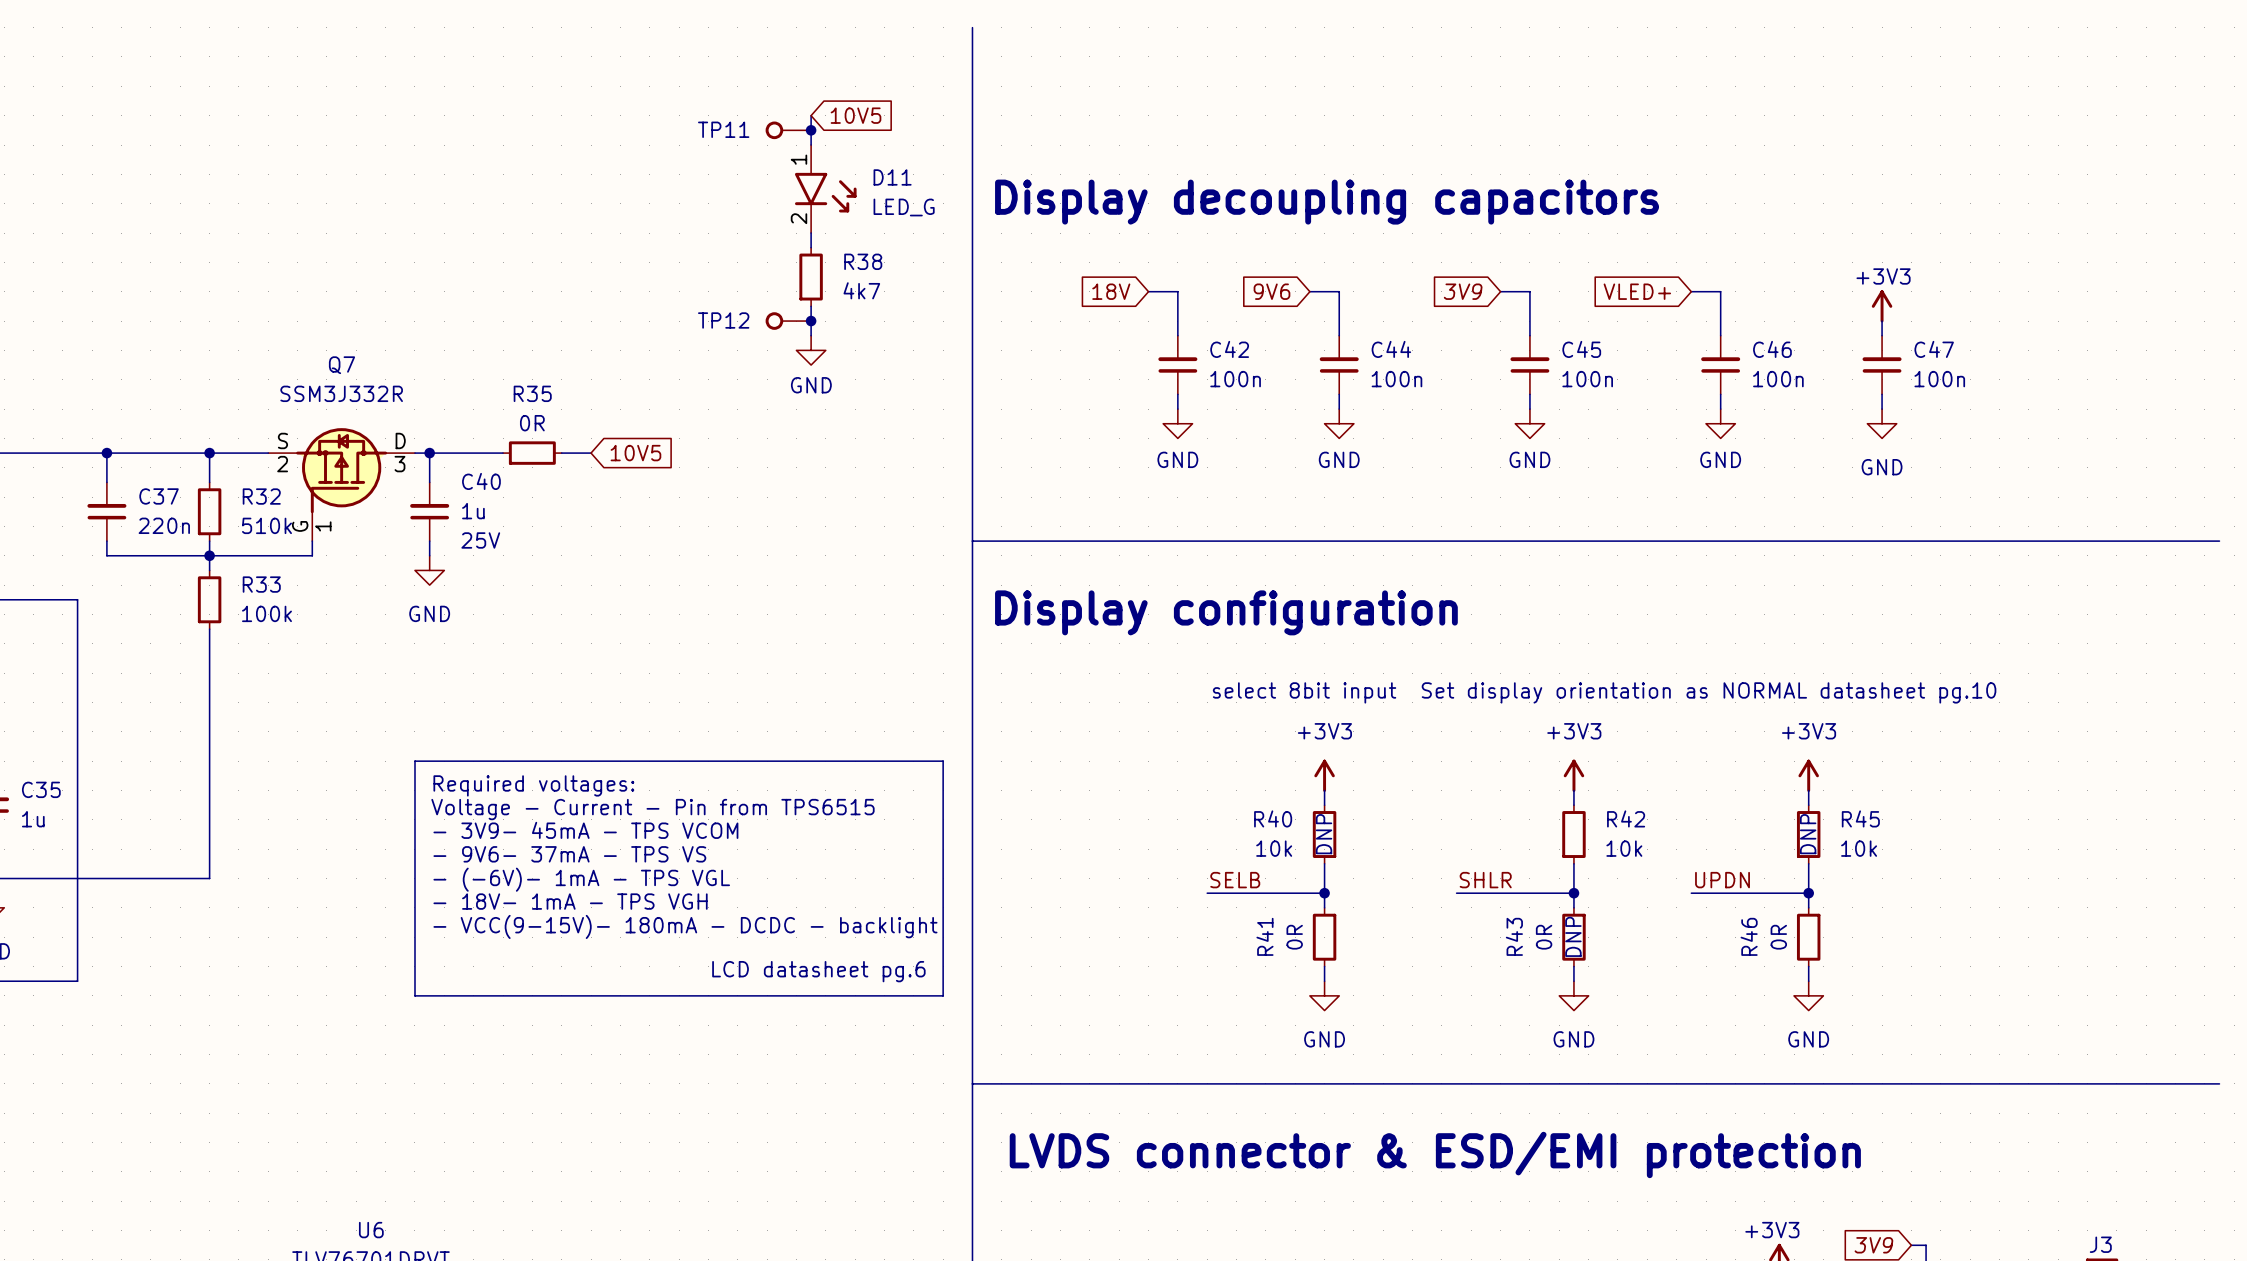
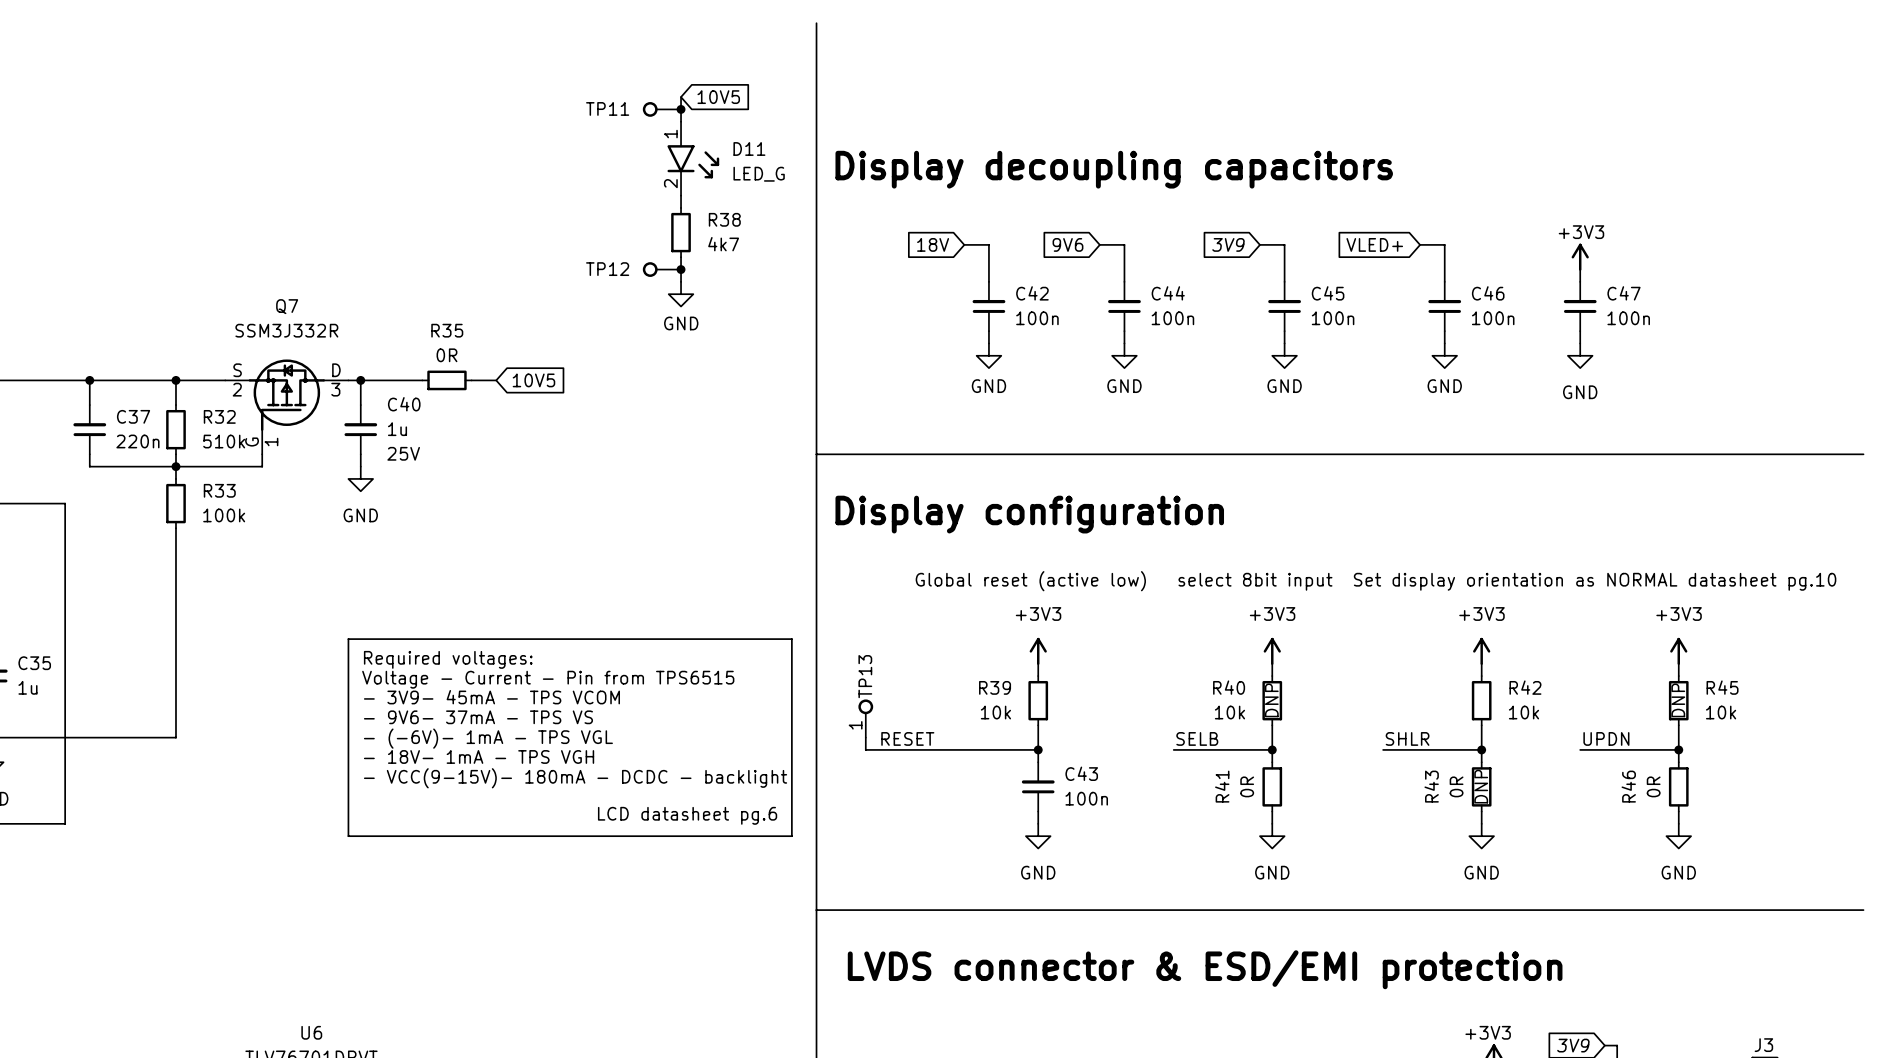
text: none -> Global reset (active low) (1030, 581)
text position: select 8bit input (1304, 692) -> select 8bit input (1255, 581)
text position: Set display orientation as NORMAL datasheet pg.10 (1709, 692) -> Set display orientation as NORMAL datasheet pg.10 (1595, 581)
power symbol position: +3V3 (1324, 775) -> +3V3 (1038, 651)
power symbol position: +3V3 (1573, 775) -> +3V3 (1272, 651)
power symbol position: +3V3 (1808, 775) -> +3V3 (1481, 651)
power symbol: none -> +3V3 (1678, 651)
wire: none -> (1038, 663) (1038, 676)
wire: (1324, 790) (1324, 805) -> (1272, 663) (1272, 676)
wire: (1573, 790) (1573, 805) -> (1481, 663) (1481, 676)
wire: (1808, 790) (1808, 805) -> (1678, 663) (1678, 676)
R39: none -> (1038, 700)
R40 position: (1324, 834) -> (1272, 700)
R42 position: (1573, 834) -> (1481, 700)
R45 position: (1808, 834) -> (1678, 700)
TP13: none -> (865, 718)
wire: none -> (1038, 725) (1038, 762)
wire: (1324, 863) (1324, 907) -> (1272, 725) (1272, 762)
wire: (1573, 863) (1573, 907) -> (1481, 725) (1481, 762)
wire: (1808, 863) (1808, 907) -> (1678, 725) (1678, 762)
wire: none -> (865, 737) (865, 749) (1013, 749)
label: none -> RESET (907, 738)
label position: SELB (1235, 880) -> SELB (1197, 738)
label position: SHLR (1485, 880) -> SHLR (1407, 738)
label position: UPDN (1722, 880) -> UPDN (1606, 738)
wire: (1236, 893) (1324, 893) -> none
junction: none -> (1038, 749)
junction: (1324, 893) -> none
wire: (1515, 893) (1573, 893) -> (1173, 749) (1223, 749)
junction position: (1573, 893) -> (1272, 749)
wire: (1764, 893) (1808, 893) -> (1383, 749) (1420, 749)
junction position: (1808, 893) -> (1481, 749)
wire: none -> (1580, 749) (1678, 749)
junction: none -> (1678, 749)
C43: none -> (1038, 786)
R41 position: (1324, 937) -> (1272, 786)
R43 position: (1573, 937) -> (1481, 786)
R46 position: (1808, 937) -> (1678, 786)
wire: none -> (1038, 811) (1038, 823)
wire: (1324, 966) (1324, 981) -> (1272, 811) (1272, 823)
wire: (1573, 966) (1573, 981) -> (1481, 811) (1481, 823)
wire: (1808, 966) (1808, 981) -> (1678, 811) (1678, 823)
power symbol position: GND (1324, 995) -> GND (1038, 836)
power symbol position: GND (1573, 995) -> GND (1272, 836)
power symbol position: GND (1808, 995) -> GND (1481, 836)
power symbol: none -> GND (1678, 836)

